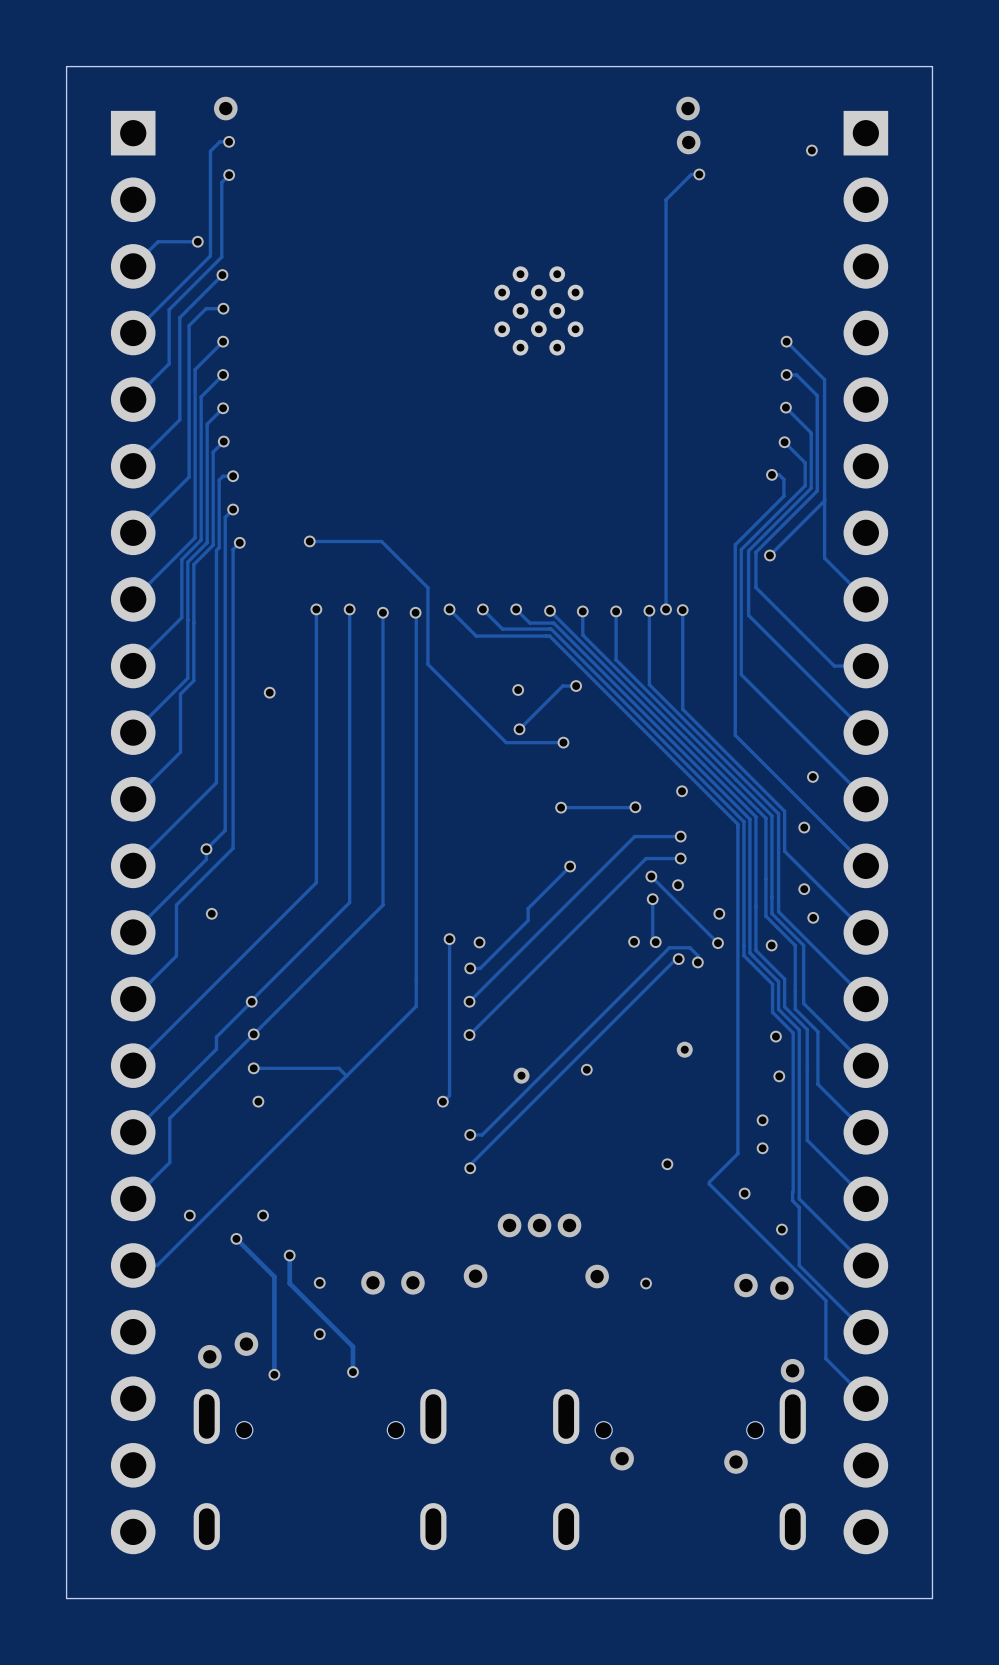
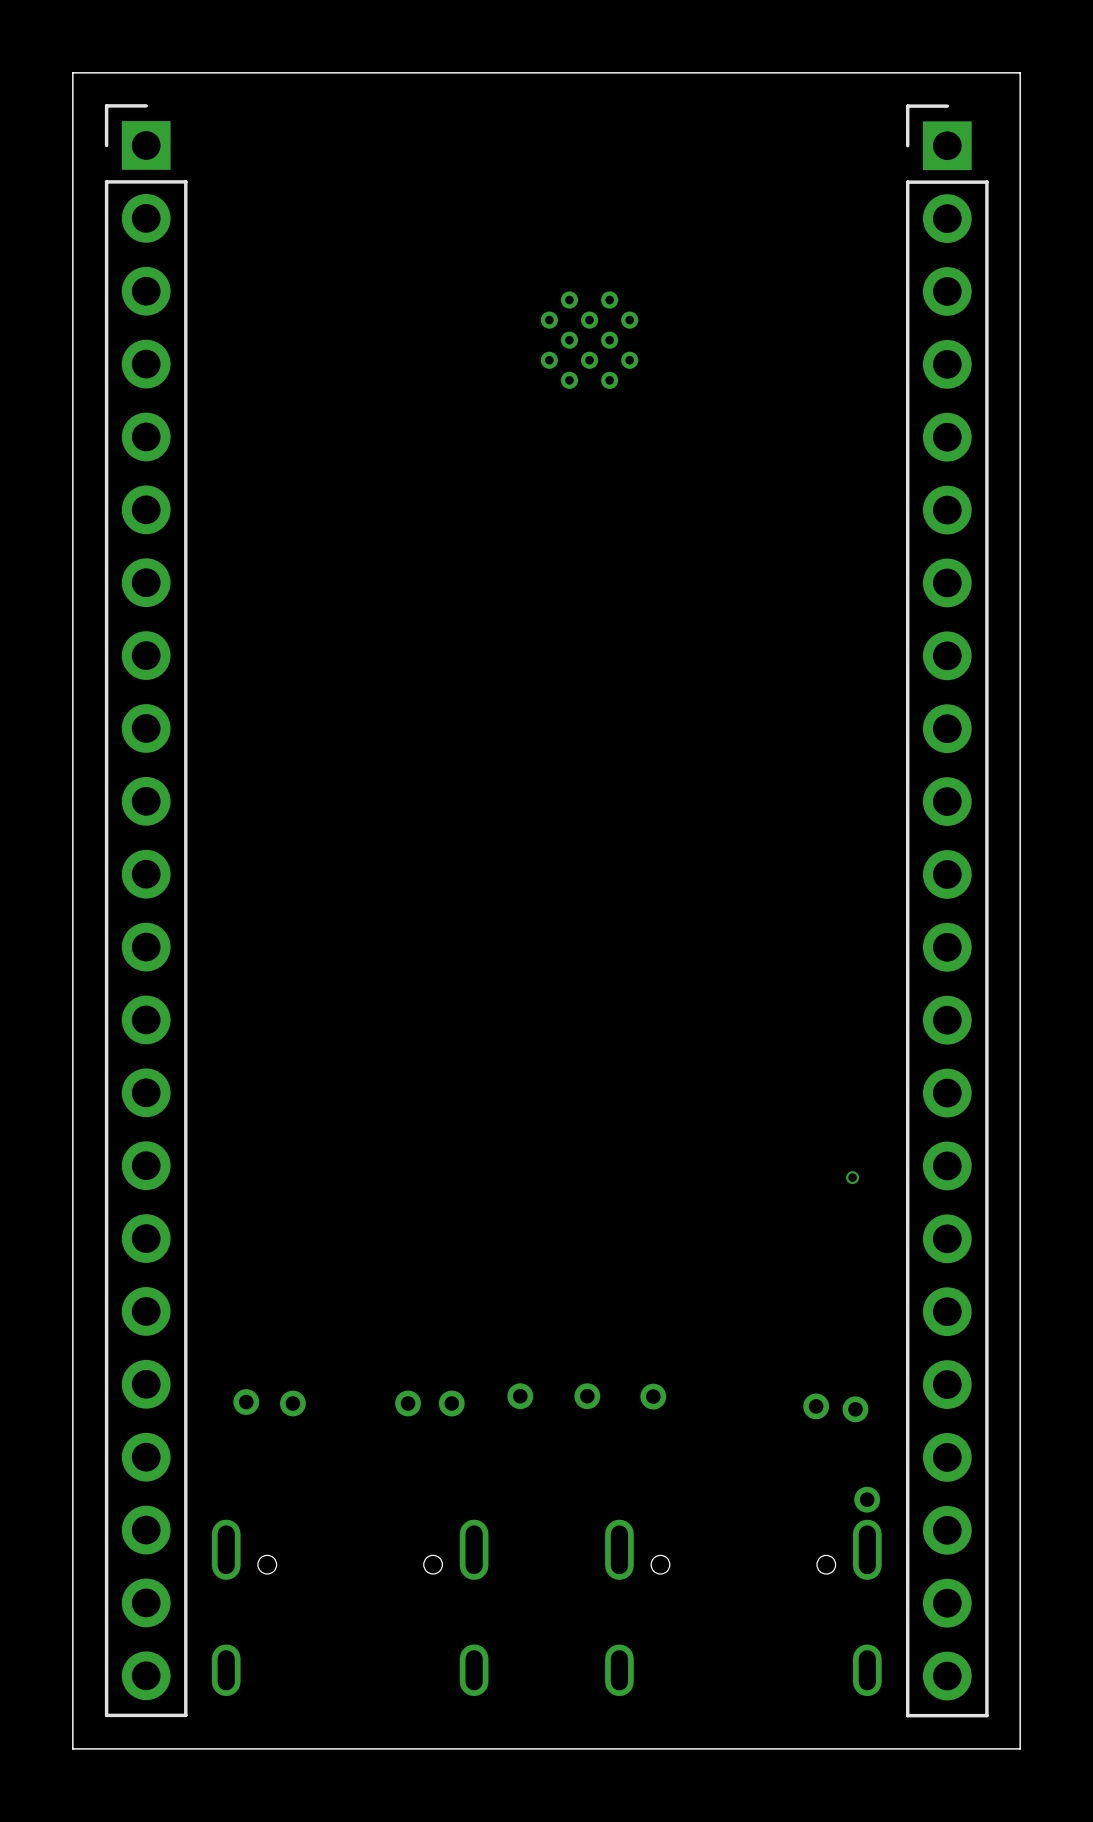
via: (225, 108) -> none
via: (688, 108) -> none
track: (229, 141) (219, 141) (210, 151) (210, 255) (133, 332) -> none
via: (229, 141) -> none
via: (688, 142) -> none
via: (811, 150) -> none
track: (698, 174) (691, 174) (666, 199) (666, 609) -> none
via: (699, 174) -> none
track: (229, 175) (221, 182) (221, 257) (169, 309) (169, 363) (133, 399) -> none
via: (229, 175) -> none
track: (197, 241) (158, 241) (133, 266) -> none
via: (197, 241) -> none
track: (222, 275) (179, 317) (179, 419) (133, 466) -> none
via: (222, 275) -> none
track: (223, 308) (206, 308) (189, 325) (189, 477) (133, 532) -> none
via: (223, 308) -> none
track: (223, 341) (195, 369) (195, 537) (133, 599) -> none
via: (223, 341) -> none
track: (786, 341) (824, 379) (824, 558) (865, 599) -> none
via: (786, 341) -> none
track: (223, 374) (201, 396) (201, 540) (181, 559) (181, 617) (133, 665) -> none
via: (223, 374) -> none
track: (786, 374) (796, 374) (817, 395) (817, 490) (755, 552) (755, 587) (834, 666) (865, 666) -> none
via: (786, 374) -> none
track: (785, 407) (811, 432) (811, 488) (748, 550) (748, 615) (865, 732) -> none
via: (785, 407) -> none
track: (223, 408) (207, 424) (207, 542) (187, 562) (187, 678) (133, 732) -> none
via: (223, 408) -> none
track: (223, 441) (213, 452) (213, 545) (193, 564) (193, 680) (180, 694) (180, 752) (133, 799) -> none
via: (223, 441) -> none
track: (784, 442) (805, 462) (805, 485) (741, 549) (741, 674) (865, 799) -> none
via: (784, 442) -> none
track: (771, 474) (779, 474) (783, 479) (783, 496) (735, 544) (735, 735) (865, 865) -> none
via: (771, 474) -> none
track: (233, 476) (223, 476) (219, 480) (219, 547) (216, 550) (216, 782) (133, 865) -> none
via: (233, 476) -> none
track: (824, 500) (769, 555) -> none
track: (233, 509) (225, 517) (225, 830) (206, 849) (206, 859) (133, 932) -> none
via: (233, 509) -> none
track: (309, 541) (381, 541) (427, 587) (427, 664) (506, 742) (563, 742) -> none
via: (309, 541) -> none
track: (239, 542) (233, 549) (233, 848) (176, 905) (176, 956) (133, 998) -> none
via: (239, 542) -> none
via: (769, 555) -> none
track: (316, 609) (316, 882) (133, 1065) -> none
via: (316, 609) -> none
track: (349, 609) (349, 902) (216, 1037) (216, 1049) (133, 1132) (133, 1118) -> none
via: (349, 609) -> none
track: (449, 609) (476, 636) (549, 636) (737, 824) (737, 1153) (709, 1184) (825, 1300) (825, 1358) (865, 1398) -> none
via: (449, 609) -> none
track: (482, 609) (502, 629) (551, 629) (743, 821) (743, 955) (772, 984) (772, 1012) (793, 1033) (792, 1200) (799, 1207) (799, 1265) (865, 1332) -> none
via: (482, 609) -> none
track: (516, 609) (529, 623) (553, 623) (749, 819) (749, 952) (778, 981) (778, 1009) (799, 1030) (799, 1198) (865, 1265) -> none
via: (516, 609) -> none
via: (666, 609) -> none
track: (549, 610) (755, 816) (755, 950) (784, 979) (784, 1006) (807, 1029) (807, 1140) (865, 1198) -> none
via: (550, 610) -> none
track: (616, 610) (616, 659) (771, 815) (771, 913) (803, 945) (803, 1003) (865, 1065) -> none
track: (649, 610) (649, 684) (778, 813) (778, 911) (865, 999) -> none
via: (649, 610) -> none
track: (682, 610) (682, 709) (784, 811) (784, 851) (865, 932) -> none
via: (682, 610) -> none
track: (582, 611) (582, 635) (765, 818) (765, 916) (795, 945) (795, 1009) (817, 1031) (817, 1084) (865, 1132) -> none
via: (582, 611) -> none
via: (616, 611) -> none
track: (382, 612) (382, 905) (169, 1118) (169, 1162) (133, 1198) -> none
via: (382, 612) -> none
via: (415, 612) -> none
track: (416, 612) (416, 1006) (157, 1265) (133, 1265) -> none
track: (576, 686) (562, 686) (519, 729) -> none
via: (576, 686) -> none
via: (518, 690) -> none
via: (269, 692) -> none
via: (519, 729) -> none
via: (563, 742) -> none
via: (812, 776) -> none
via: (682, 791) -> none
via: (561, 807) -> none
track: (635, 807) (561, 807) -> none
via: (635, 807) -> none
via: (804, 827) -> none
part side: top (133, 832) -> bottom (146, 910)
part side: top (865, 832) -> bottom (947, 910)
track: (680, 836) (634, 836) (469, 1001) -> none
via: (680, 836) -> none
via: (206, 849) -> none
track: (680, 858) (646, 858) (469, 1035) -> none
via: (680, 858) -> none
track: (570, 866) (528, 908) (528, 920) (480, 968) (470, 968) -> none
via: (570, 866) -> none
track: (651, 876) (718, 943) -> none
via: (651, 876) -> none
via: (678, 885) -> none
via: (804, 889) -> none
track: (652, 899) (652, 939) (655, 942) -> none
via: (652, 899) -> none
via: (211, 913) -> none
via: (719, 913) -> none
via: (813, 917) -> none
track: (449, 939) (449, 1095) (442, 1102) -> none
via: (449, 939) -> none
via: (634, 941) -> none
via: (479, 942) -> none
via: (655, 942) -> none
via: (718, 943) -> none
via: (771, 945) -> none
track: (678, 959) (676, 959) (470, 1164) (470, 1168) -> none
via: (678, 959) -> none
track: (697, 962) (697, 955) (690, 947) (669, 947) (482, 1134) (470, 1134) -> none
via: (697, 962) -> none
via: (470, 968) -> none
via: (251, 1001) -> none
via: (469, 1001) -> none
via: (253, 1034) -> none
via: (469, 1035) -> none
via: (775, 1036) -> none
via: (684, 1049) -> none
track: (253, 1068) (339, 1068) (346, 1075) -> none
via: (253, 1068) -> none
via: (586, 1069) -> none
via: (521, 1075) -> none
via: (258, 1101) -> none
via: (442, 1101) -> none
via: (762, 1120) -> none
via: (470, 1134) -> none
via: (762, 1148) -> none
via: (667, 1164) -> none
via: (470, 1168) -> none
via: (744, 1193) -> none
via: (189, 1215) -> none
via: (263, 1215) -> none
via: (509, 1225) -> none
via: (539, 1225) -> none
via: (569, 1225) -> none
via: (781, 1229) -> none
track: (236, 1238) (274, 1276) (274, 1374) -> none
via: (236, 1238) -> none
track: (289, 1255) (289, 1283) (352, 1346) (352, 1372) -> none
via: (289, 1255) -> none
via: none -> (587, 1396)
via: none -> (246, 1402)
via: none -> (292, 1403)
via: (319, 1282) -> none
via: (646, 1283) -> none
via: (319, 1334) -> none
via: (246, 1344) -> none
via: (209, 1356) -> none
via: (352, 1372) -> none
via: (274, 1374) -> none
via: (622, 1458) -> none
via: (735, 1462) -> none

